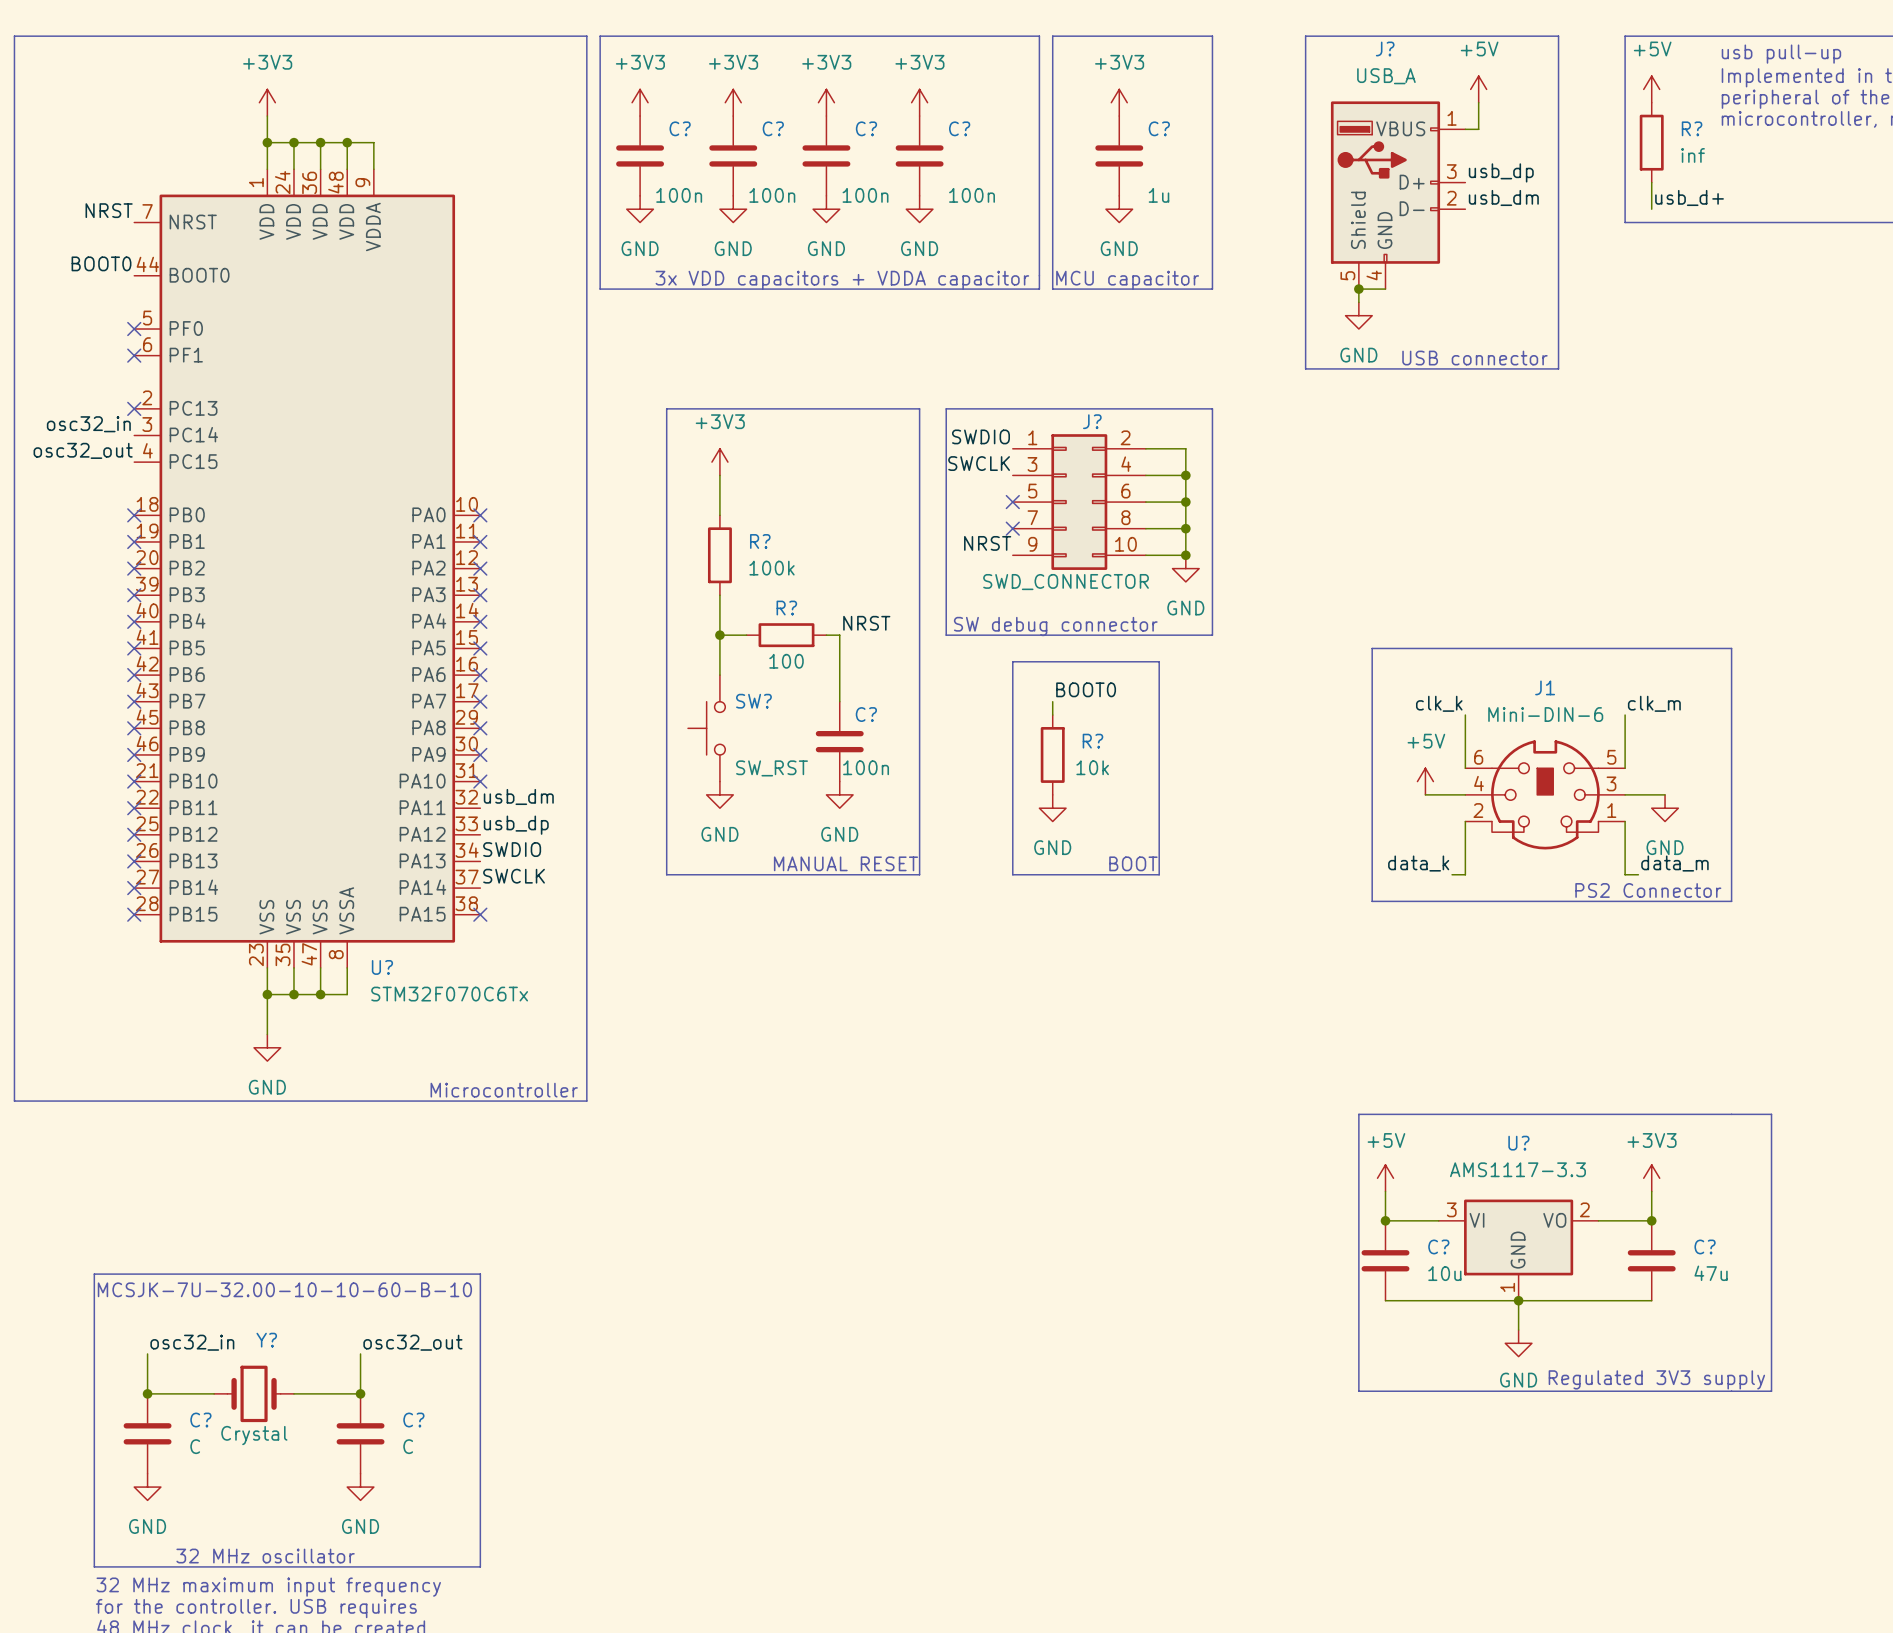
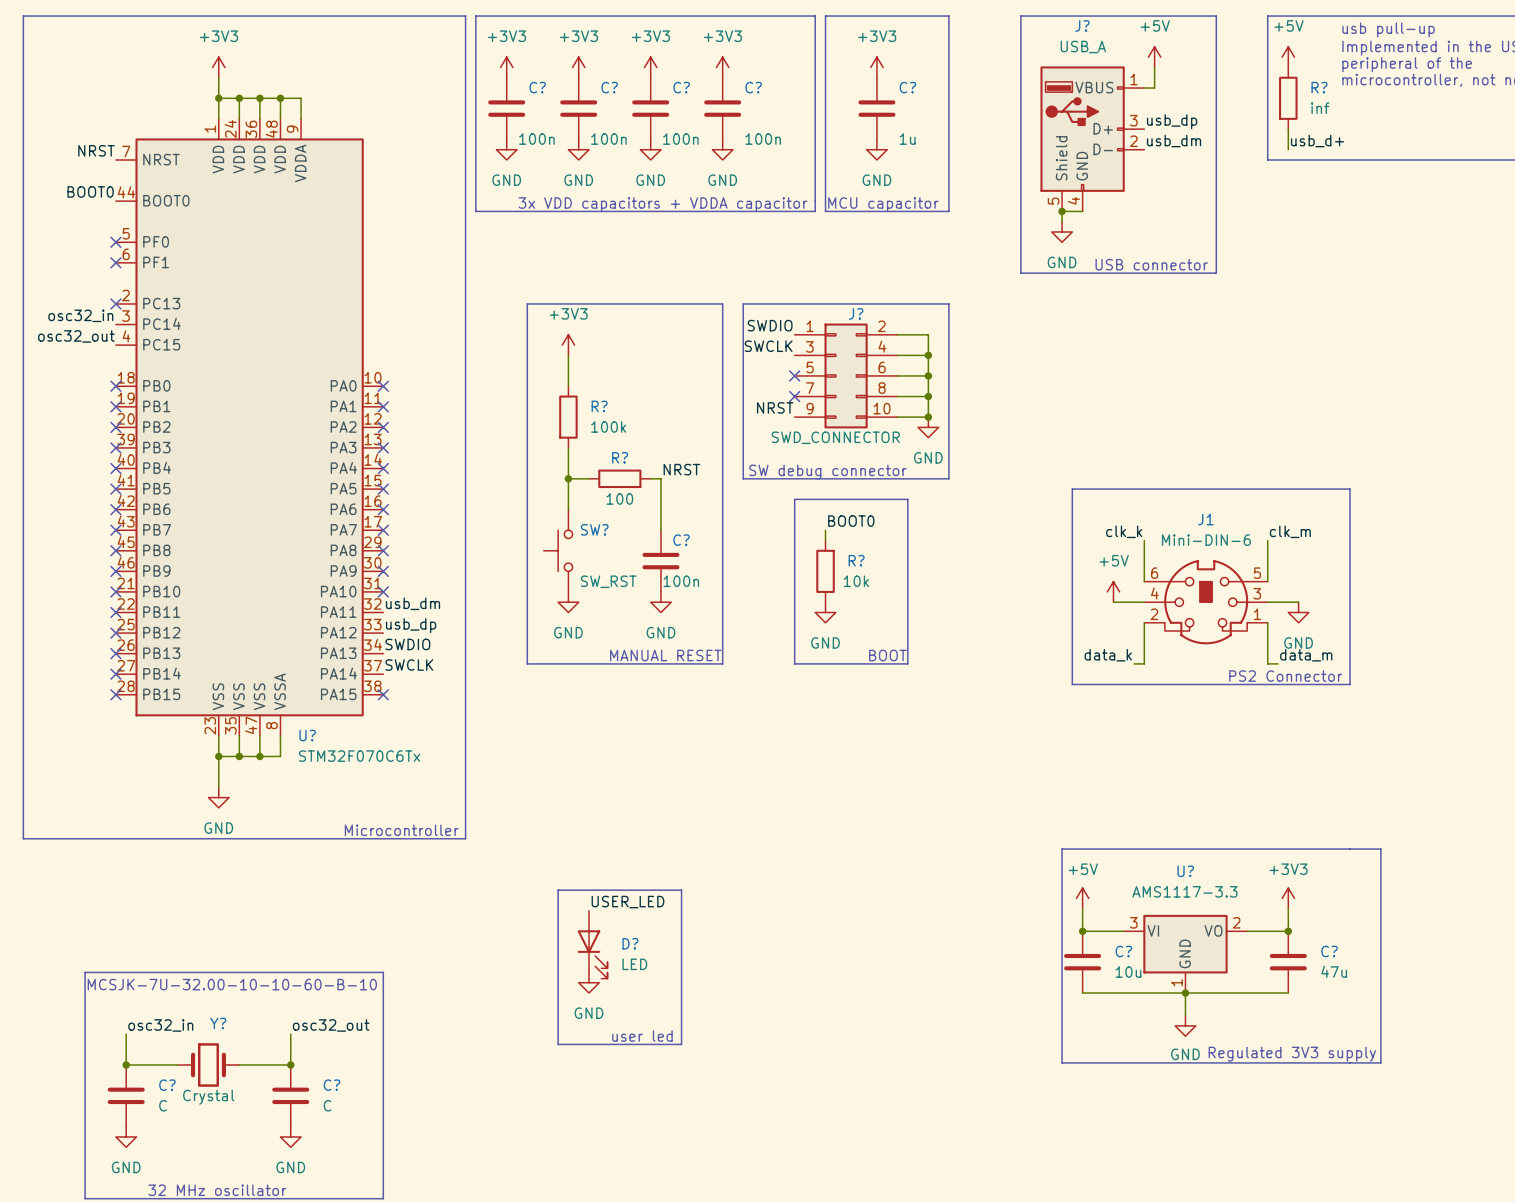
line: none -> (558, 890) (681, 890) (681, 1044) (558, 1044) (558, 890)
label: none -> USER_LED (628, 902)
D?: none -> LED (592, 944)
power symbol: none -> GND (588, 982)
text: none -> user led (642, 1036)

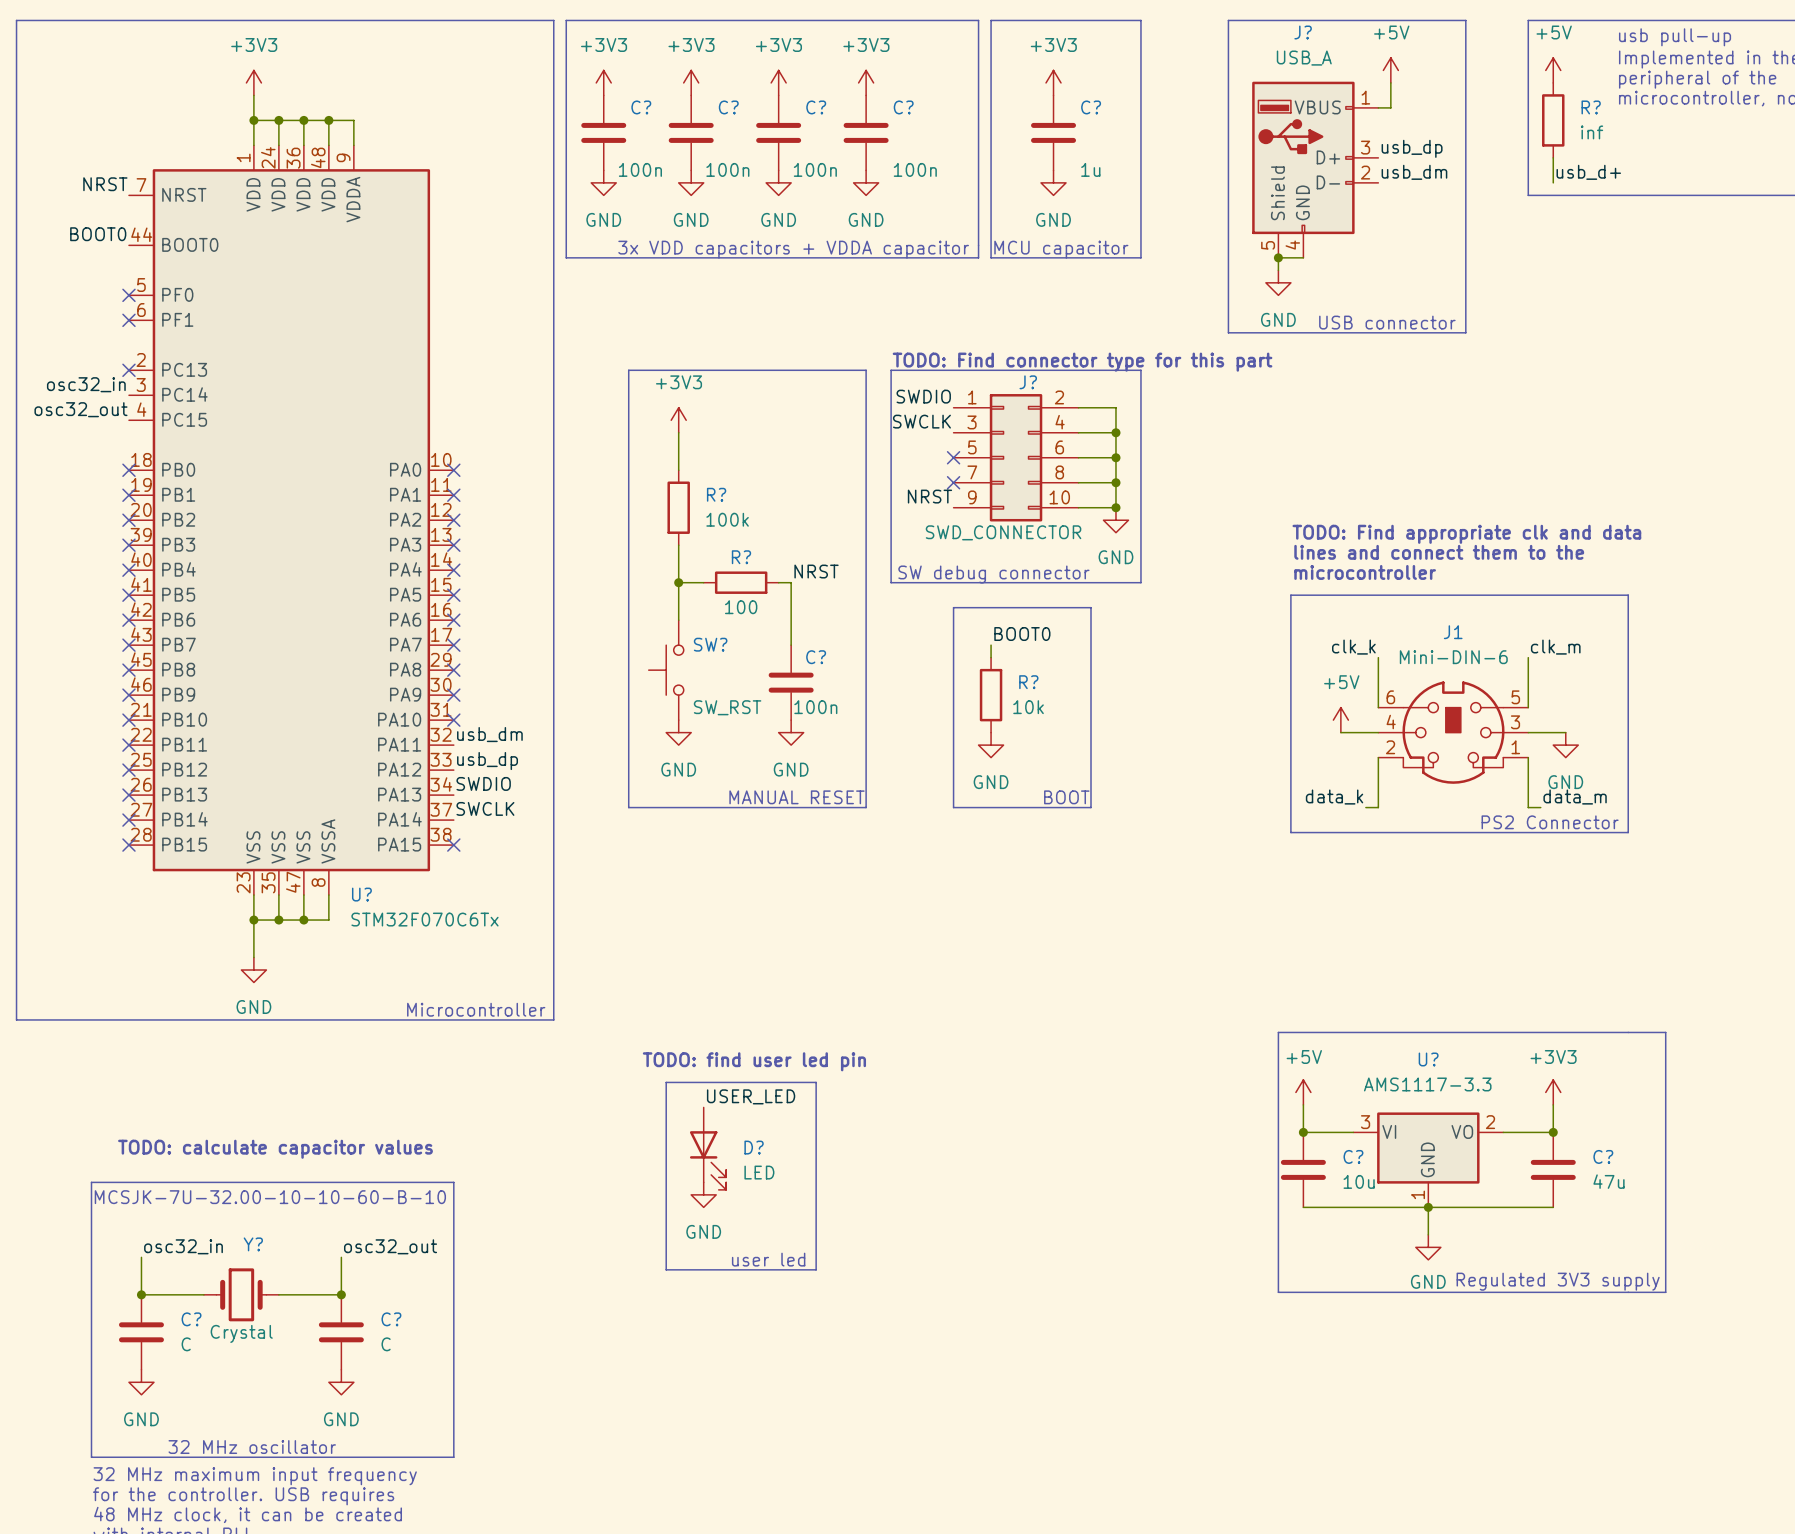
text: none -> TODO: Find connector type for this part (1082, 362)
text: none -> TODO: Find appropriate clk and data (1466, 534)
text: none -> lines and connect them to the (1439, 552)
text: none -> microcontroller (1365, 572)
text: none -> TODO: find user led pin (754, 1061)
text: none -> TODO: calculate capacitor values (275, 1149)

